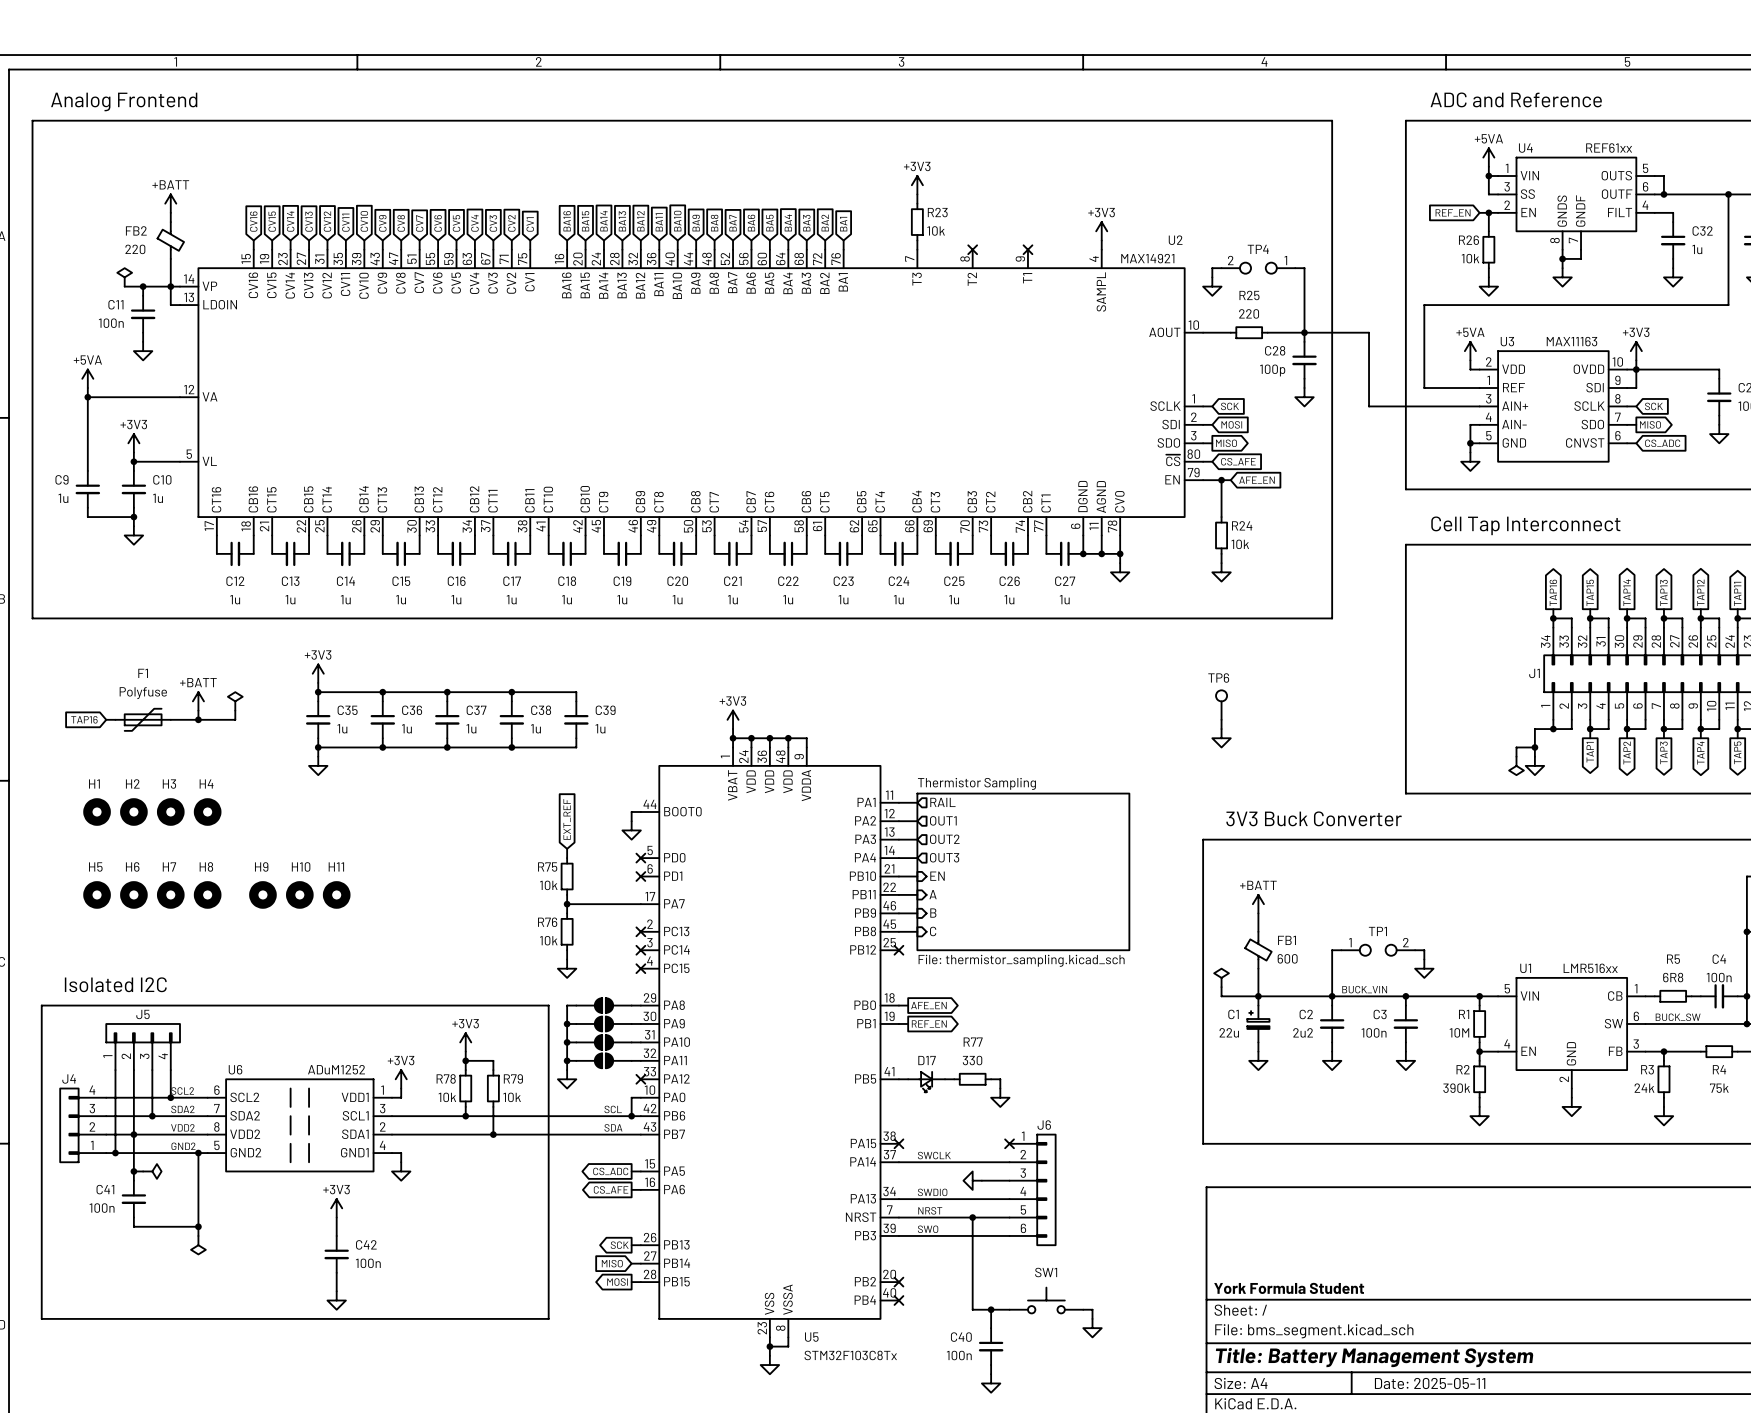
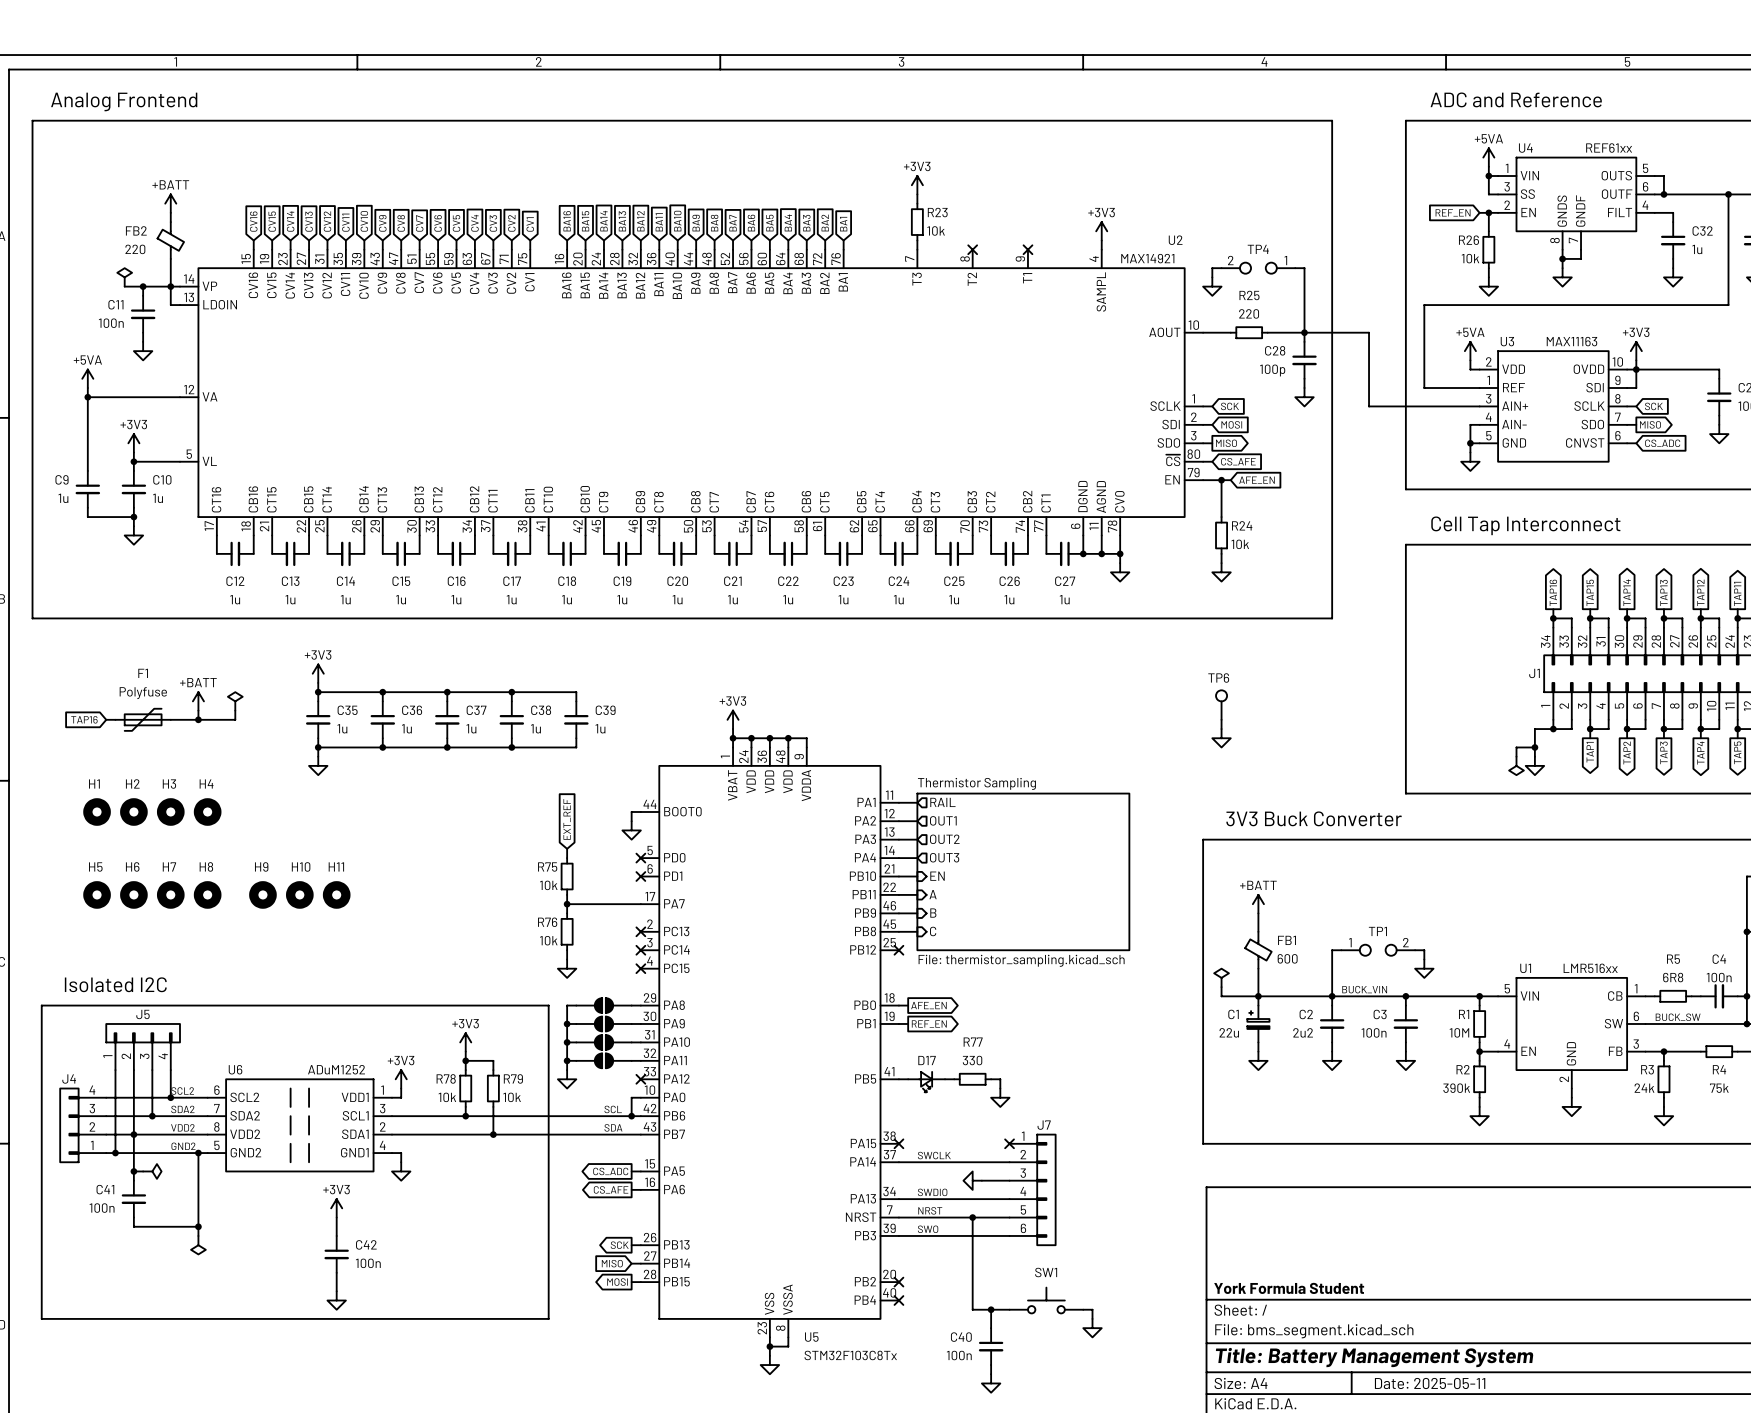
J6 name: J6 (1044, 1125) -> J7 (1044, 1125)

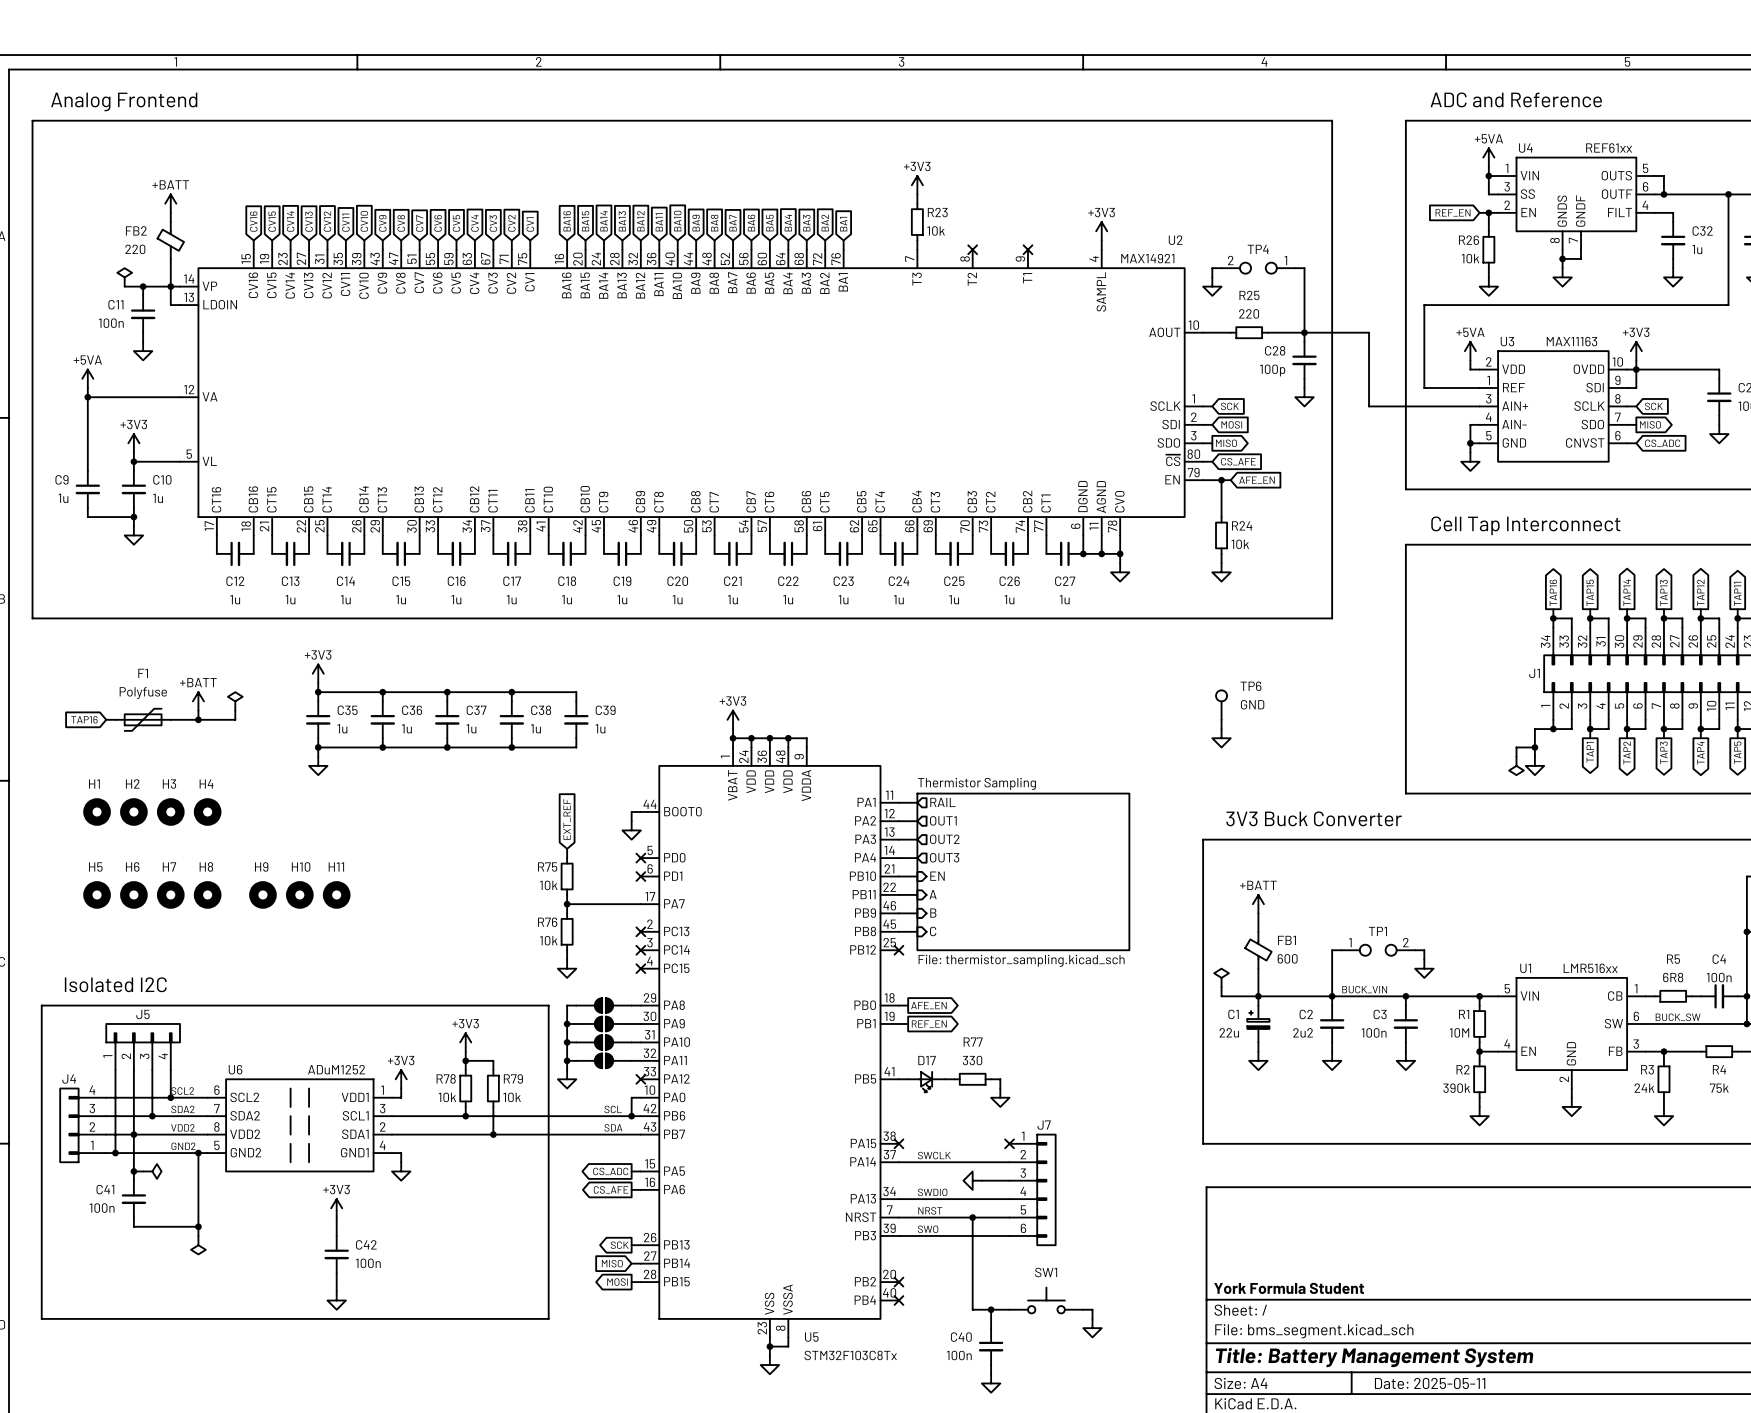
TP6 name position: TP6 (1218, 677) -> TP6 (1250, 686)
TP6 value: none -> GND (1252, 704)

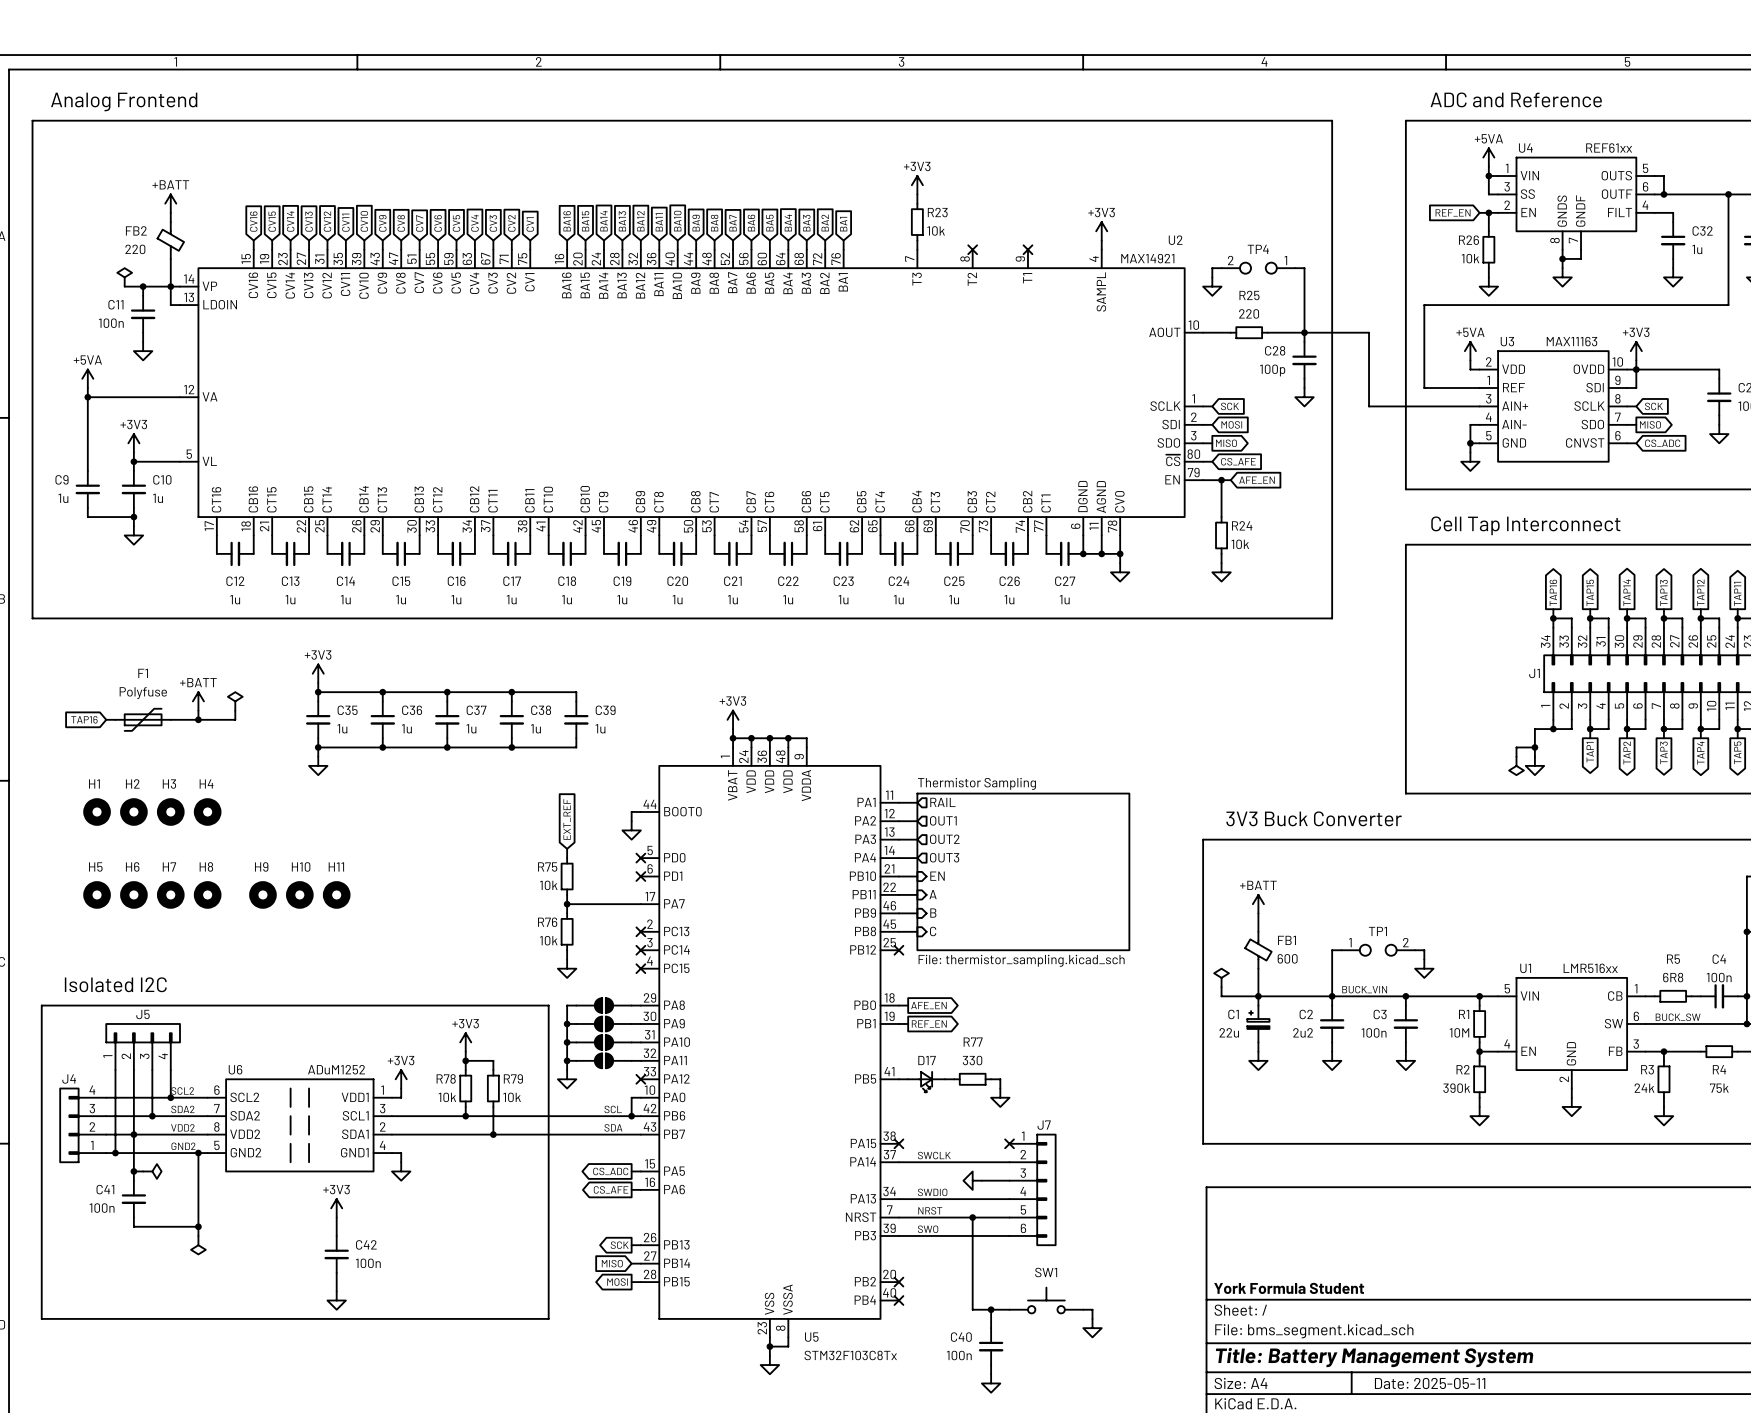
TP6: GND (1221, 705) -> none
wire: (1221, 719) (1221, 729) -> none
power symbol: (1221, 738) -> none

